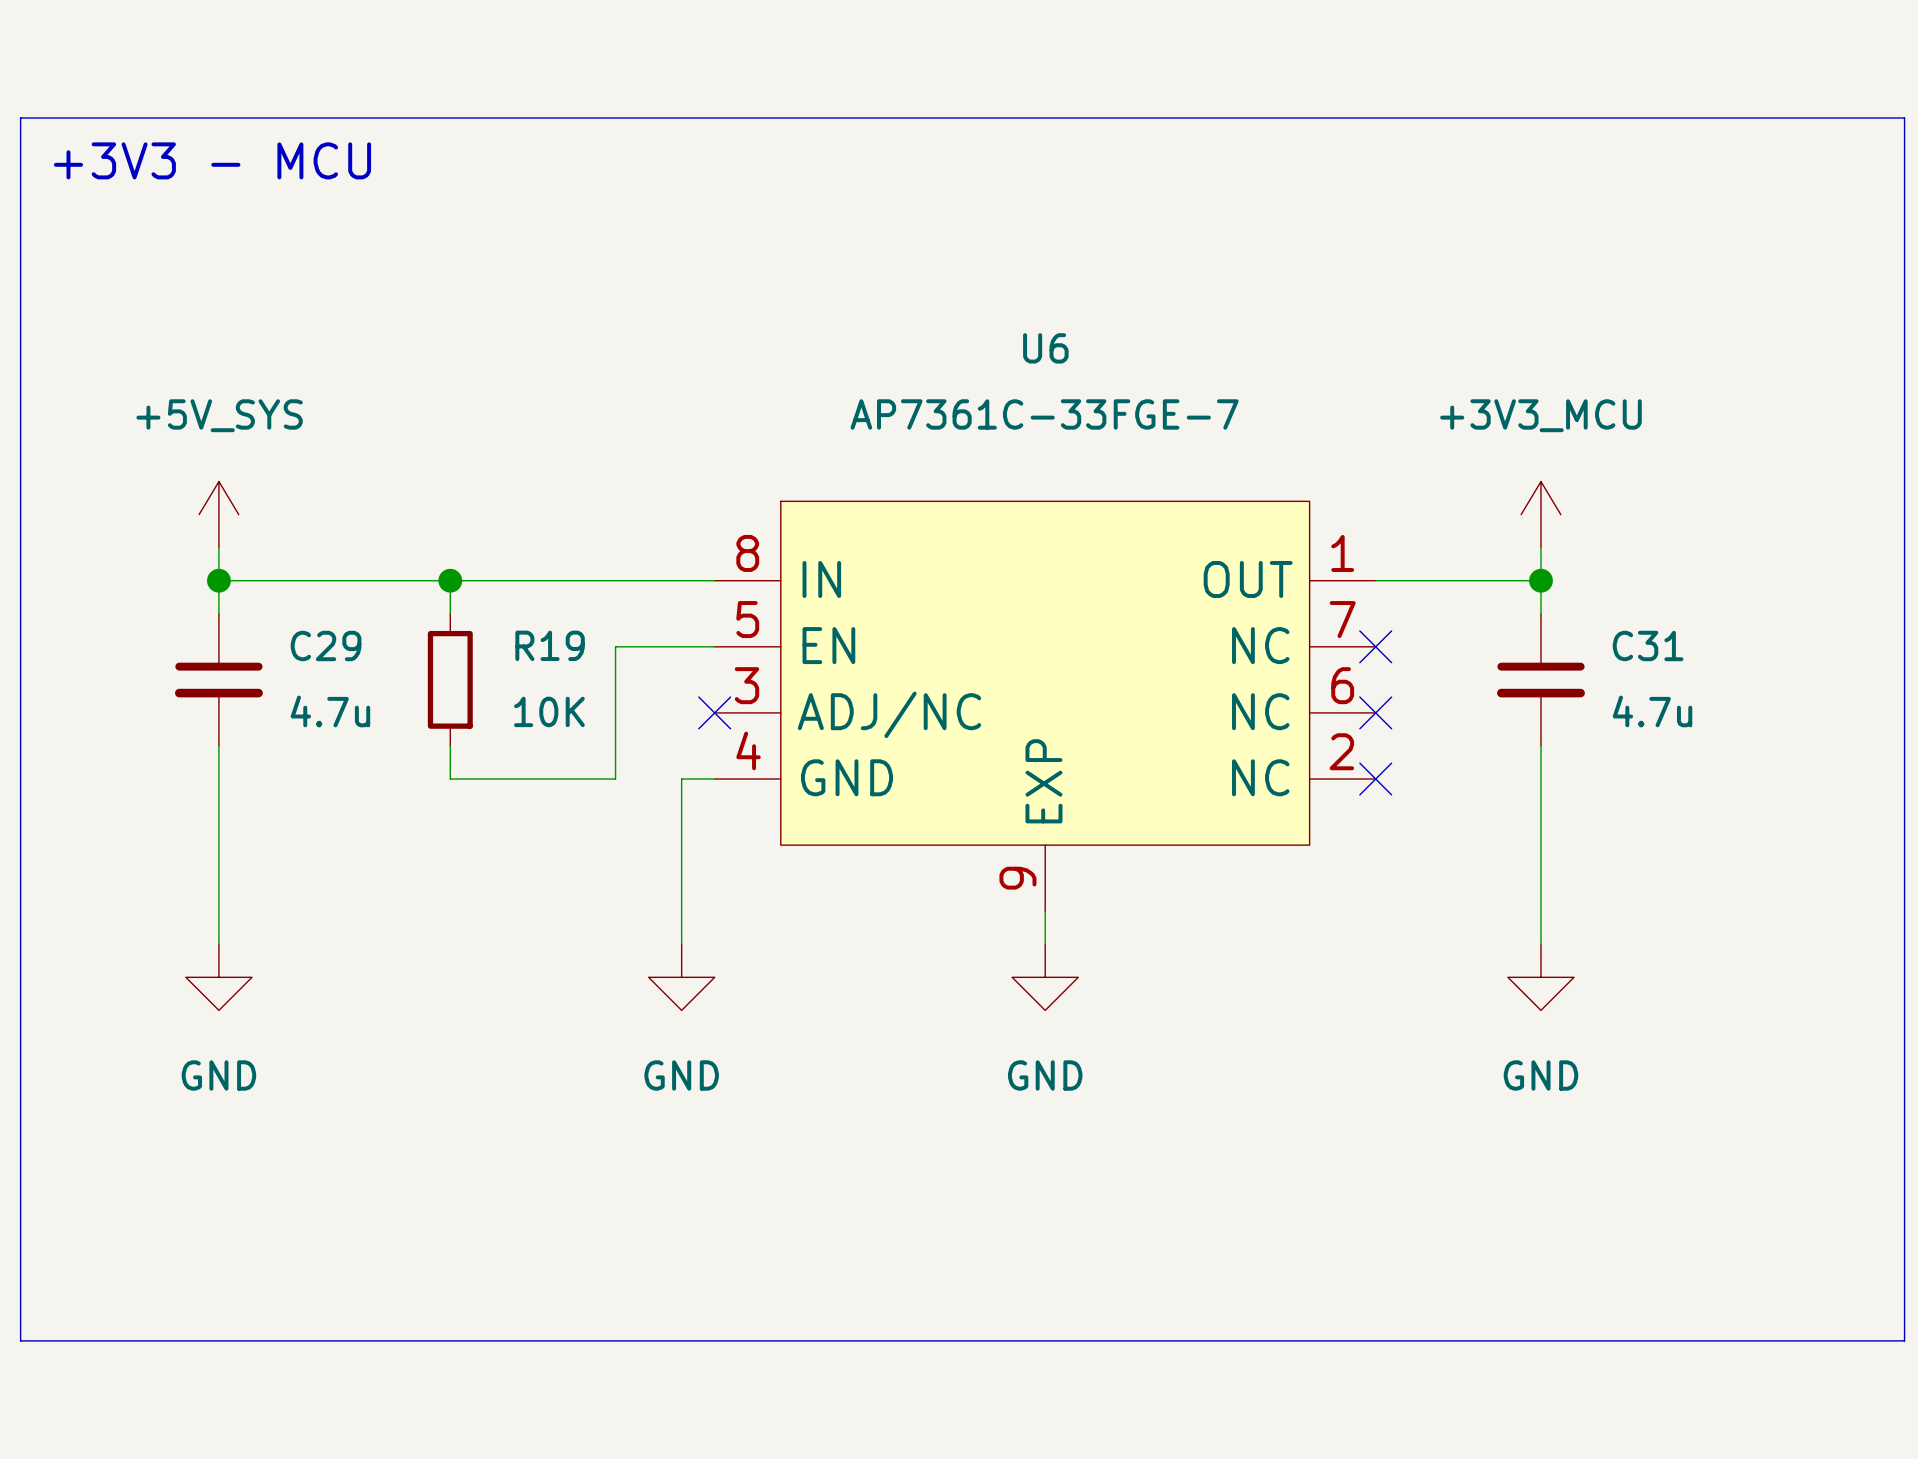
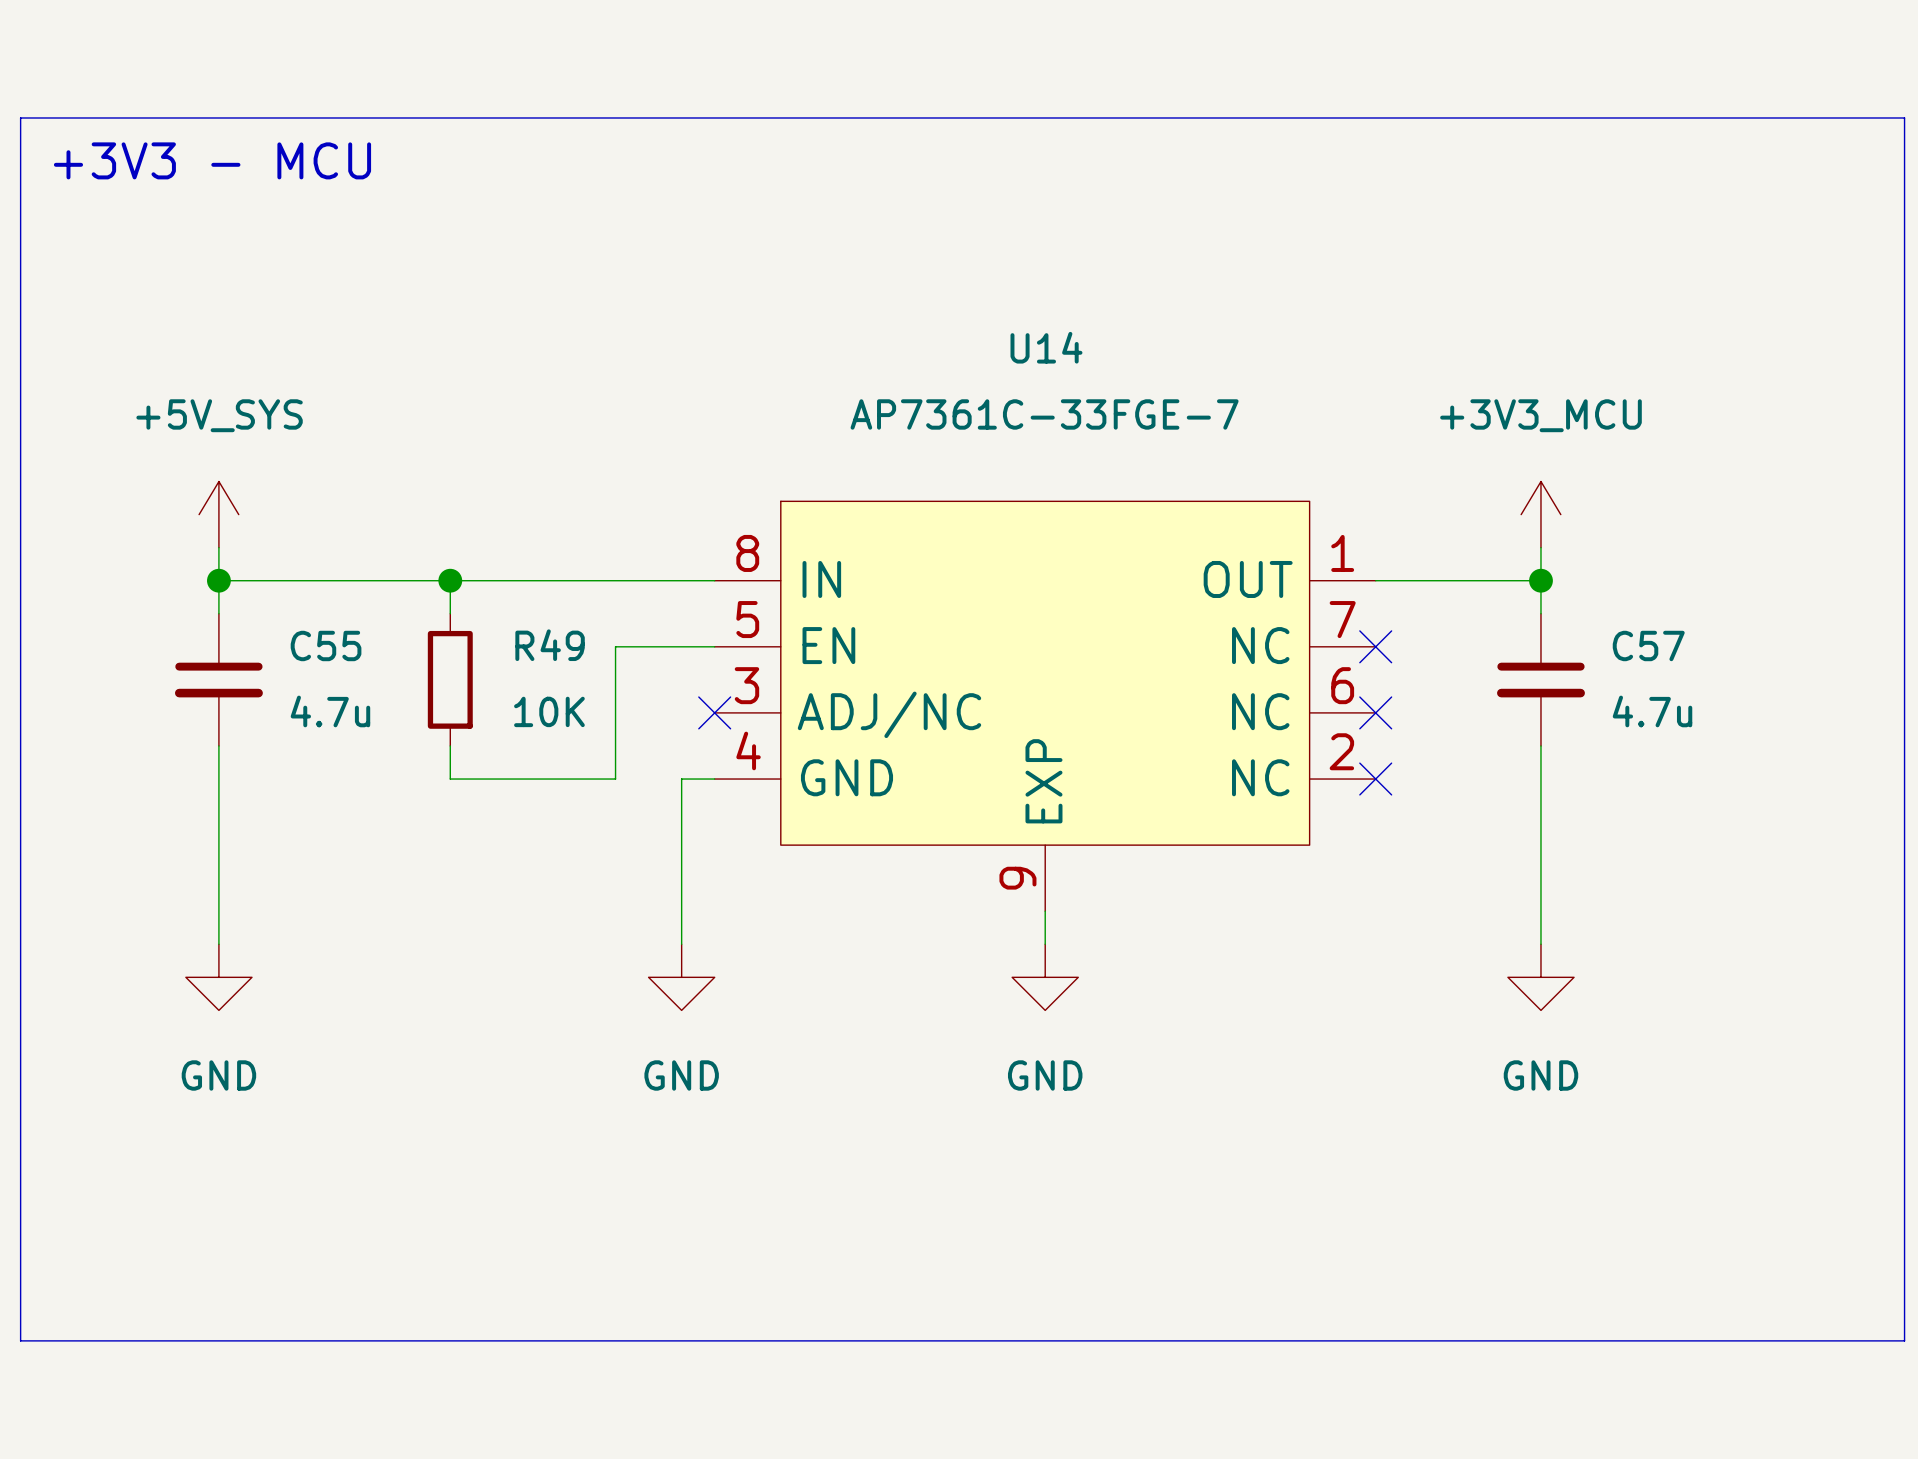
U6 name: U6 (1045, 348) -> U14 (1046, 347)
C29 name: C29 (326, 645) -> C55 (326, 645)
R19 name: R19 (550, 645) -> R49 (550, 645)
C31 name: C31 (1648, 645) -> C57 (1648, 645)

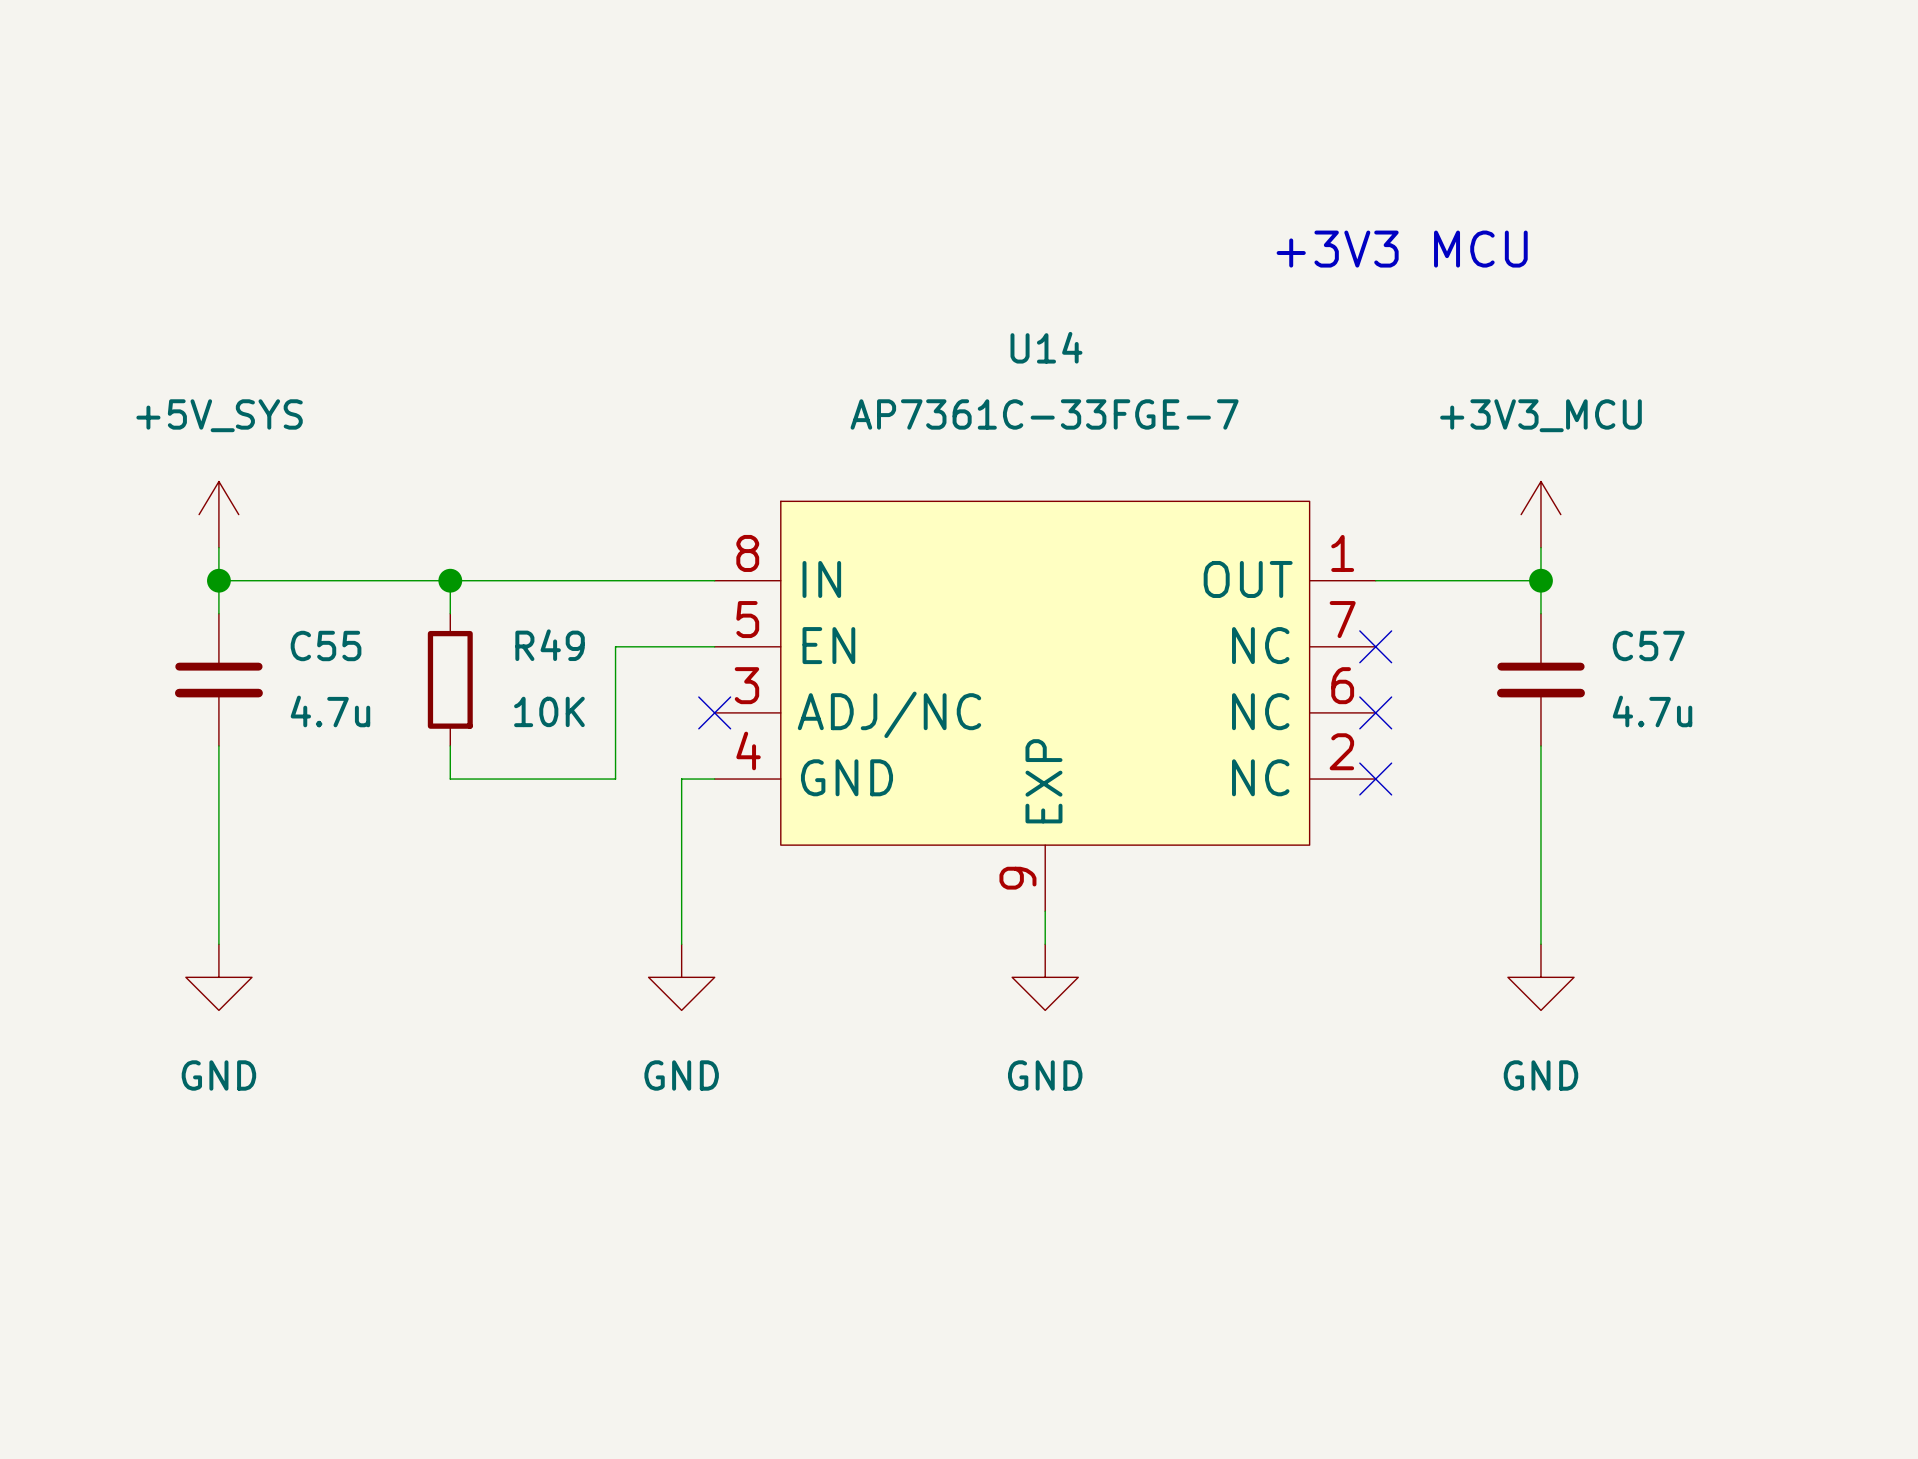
line: (20, 117) (1904, 117) (1904, 1340) (20, 1340) (20, 117) -> none
text: +3V3 - MCU (212, 160) -> none
text: none -> +3V3 MCU (1402, 249)

